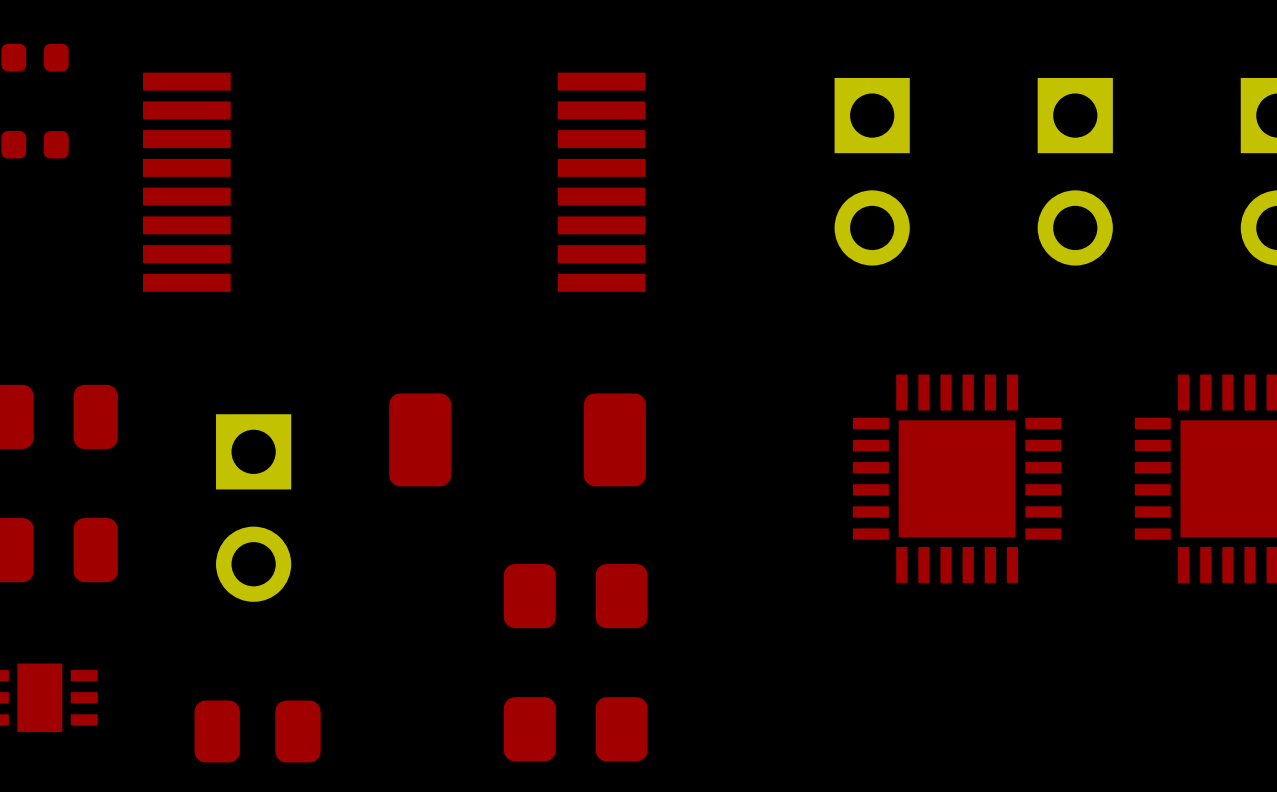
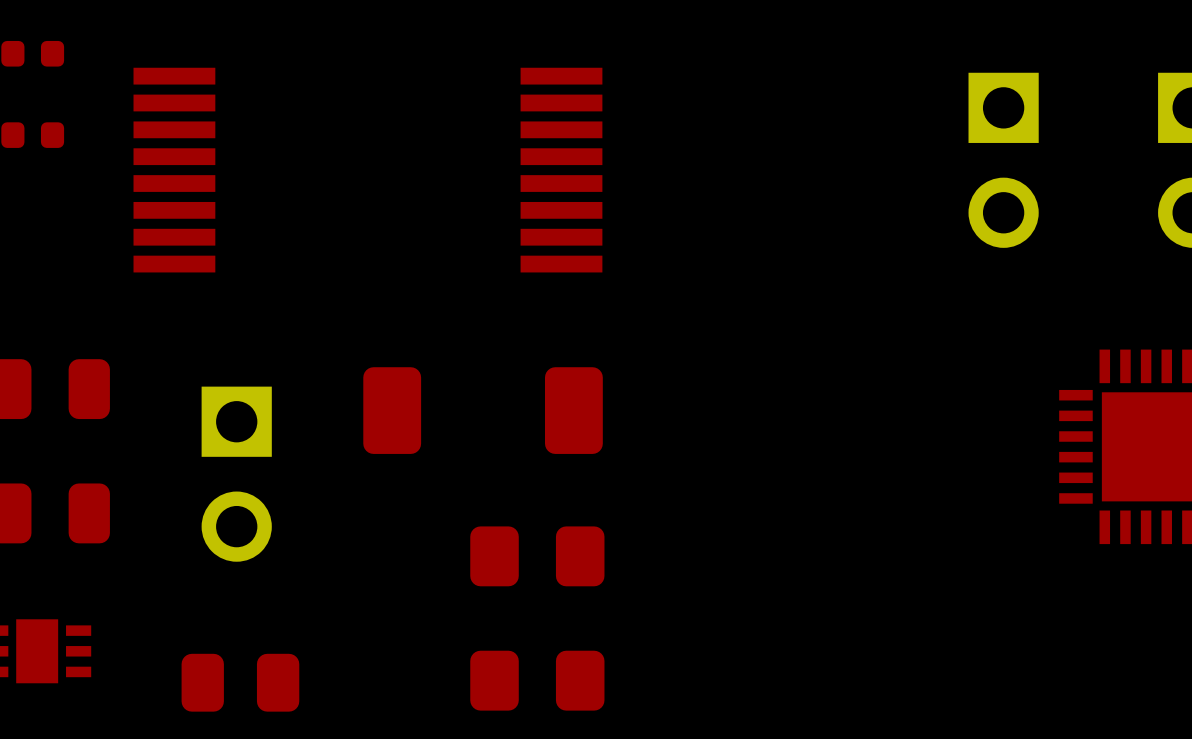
part: (872, 171) -> none
part: (957, 478) -> none

